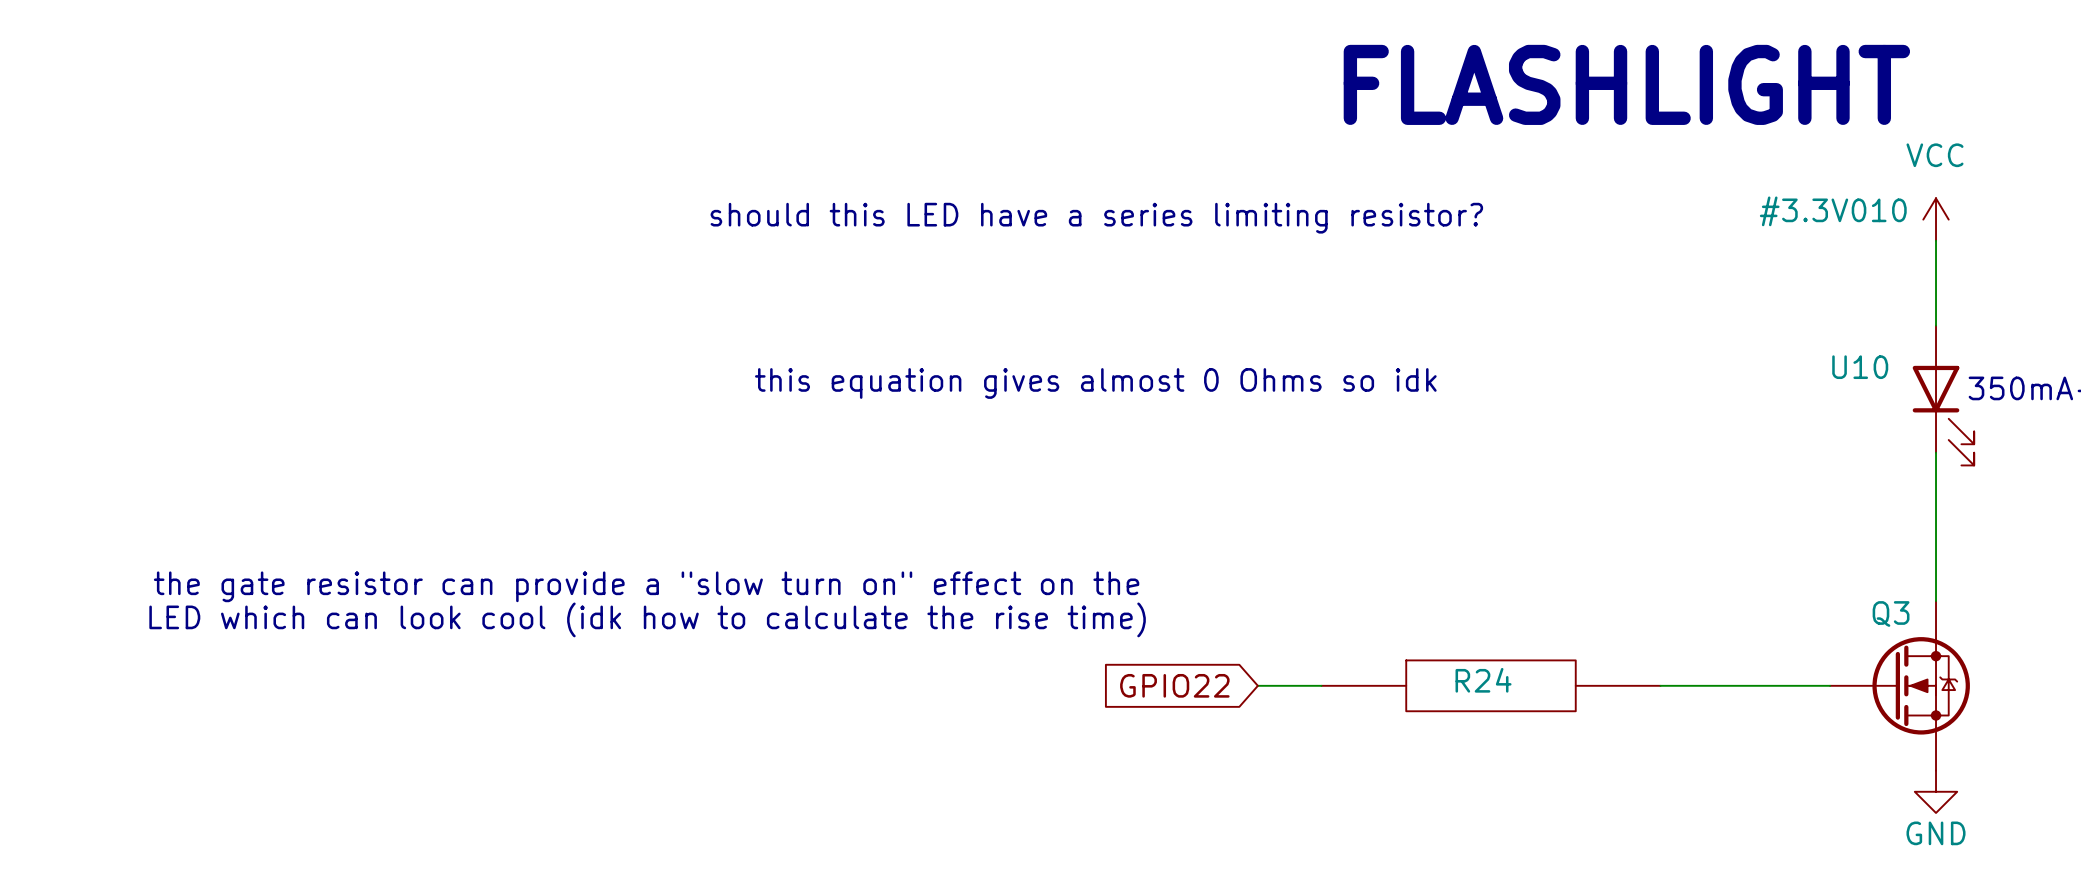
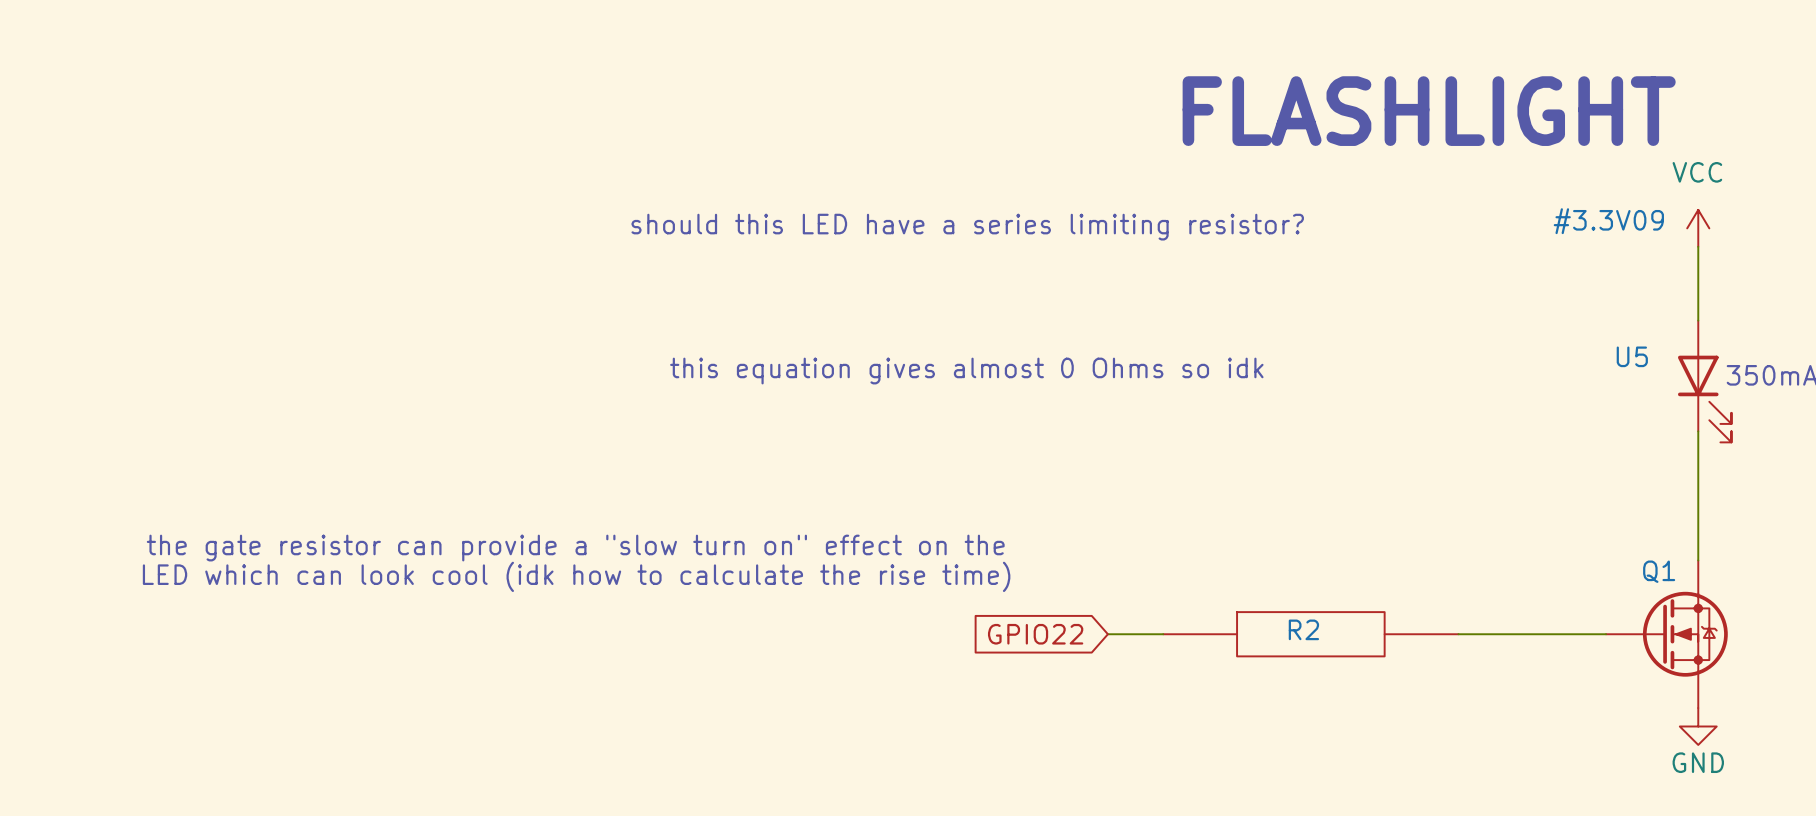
#3.3V010 name: #3.3V010 (1833, 211) -> #3.3V09 (1608, 221)
U10 name: U10 (1860, 367) -> U5 (1632, 356)
Q3 name: Q3 (1891, 613) -> Q1 (1659, 571)
R24 name: R24 (1483, 680) -> R2 (1303, 629)

